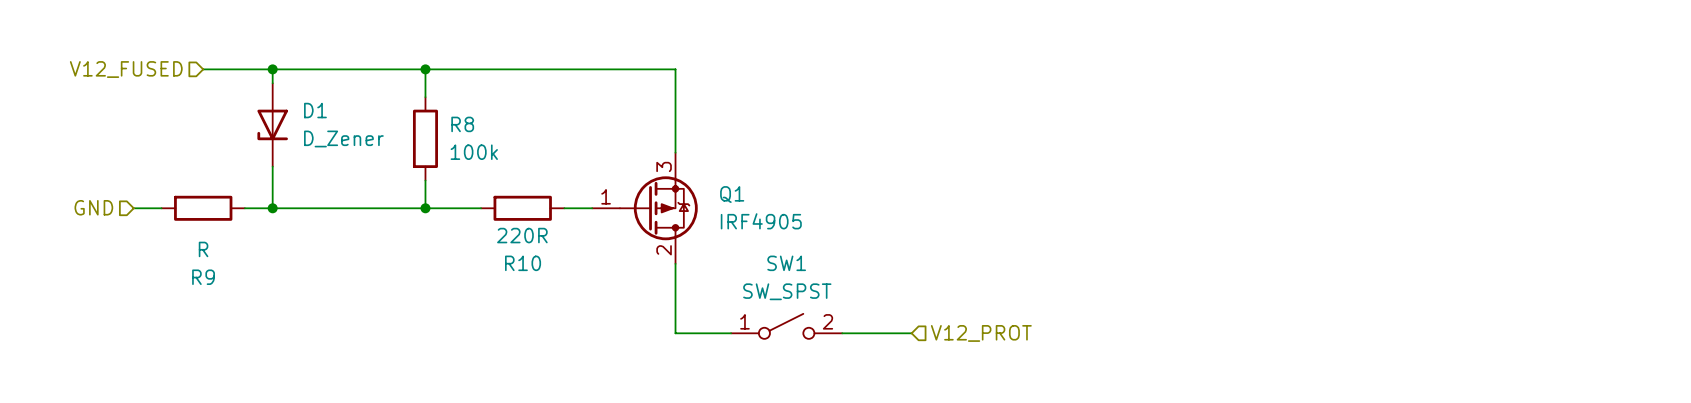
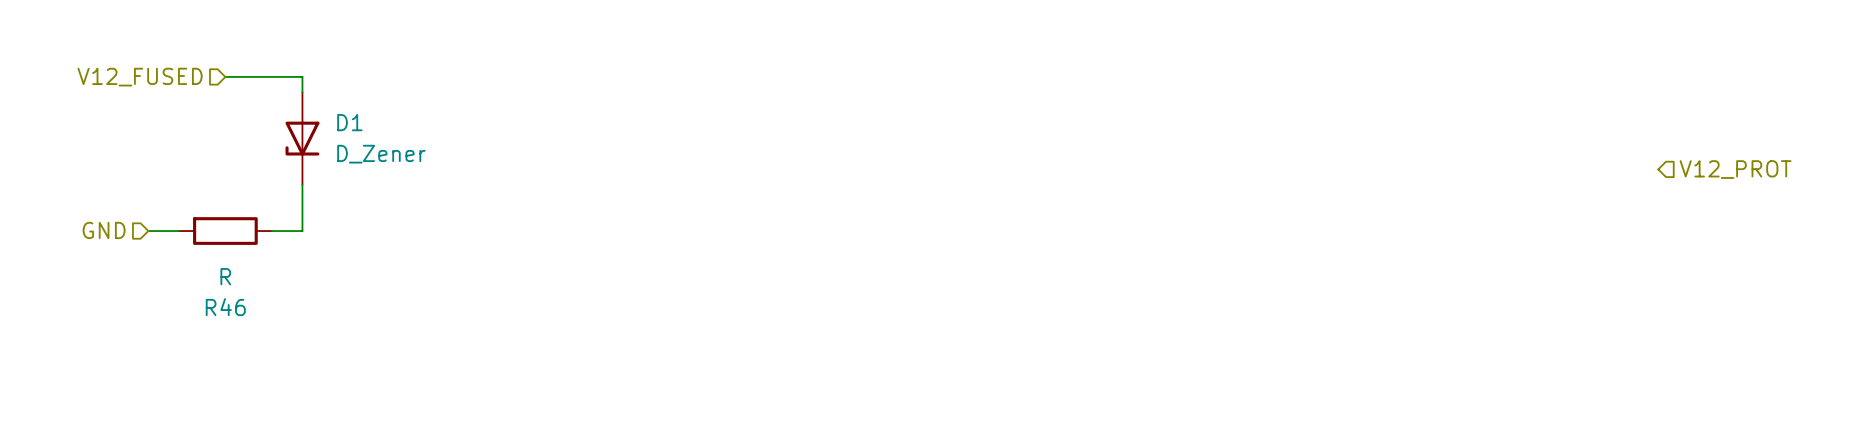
wire: (272, 69) (675, 69) (675, 152) -> none
junction: (272, 69) -> none
wire: (425, 69) (425, 97) -> none
junction: (425, 69) -> none
R8: 100k (425, 138) -> none
hierarchical label: none -> V12_PROT (1735, 169)
wire: (425, 180) (425, 208) -> none
wire: (272, 208) (481, 208) -> none
junction: (272, 208) -> none
junction: (425, 208) -> none
R10: 220R (522, 208) -> none
wire: (564, 208) (592, 208) -> none
Q1: IRF4905 (644, 208) -> none
wire: (675, 263) (675, 333) (731, 333) -> none
R9 name: R9 (203, 277) -> R46 (225, 307)
SW1: SW_SPST (786, 326) -> none
wire: (842, 333) (911, 333) -> none
hierarchical label: V12_PROT (981, 333) -> none

